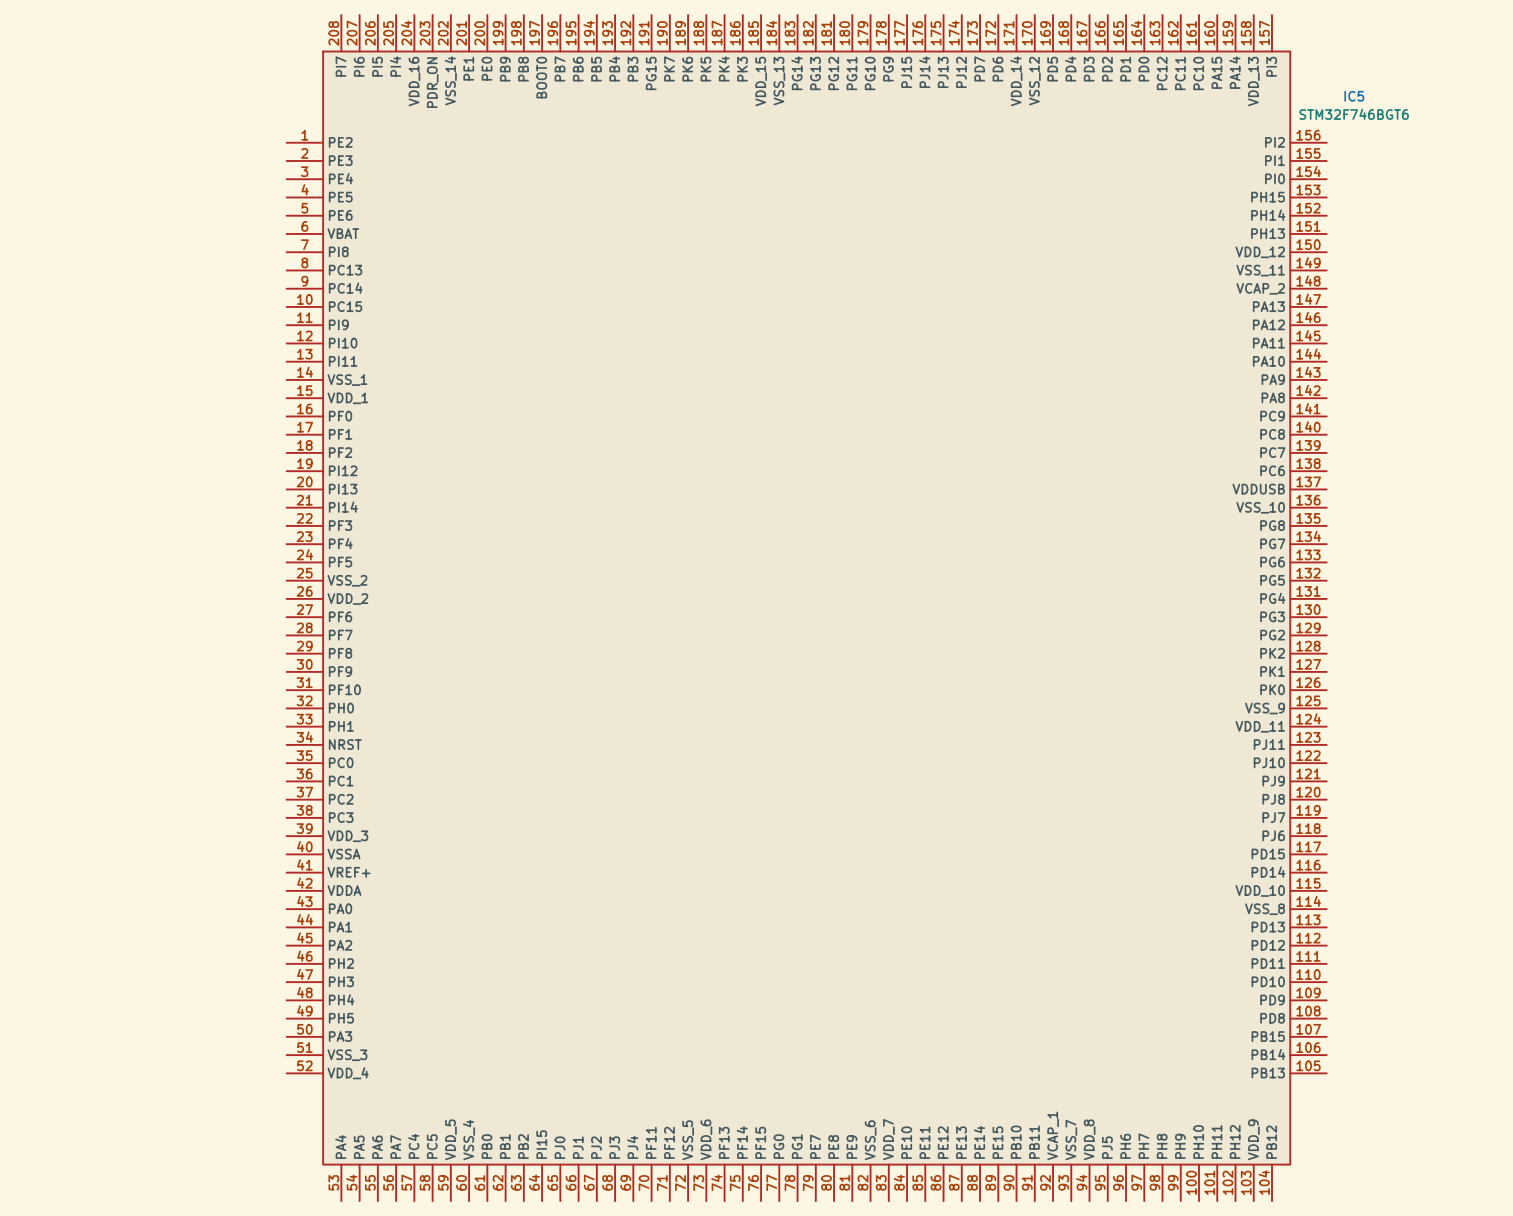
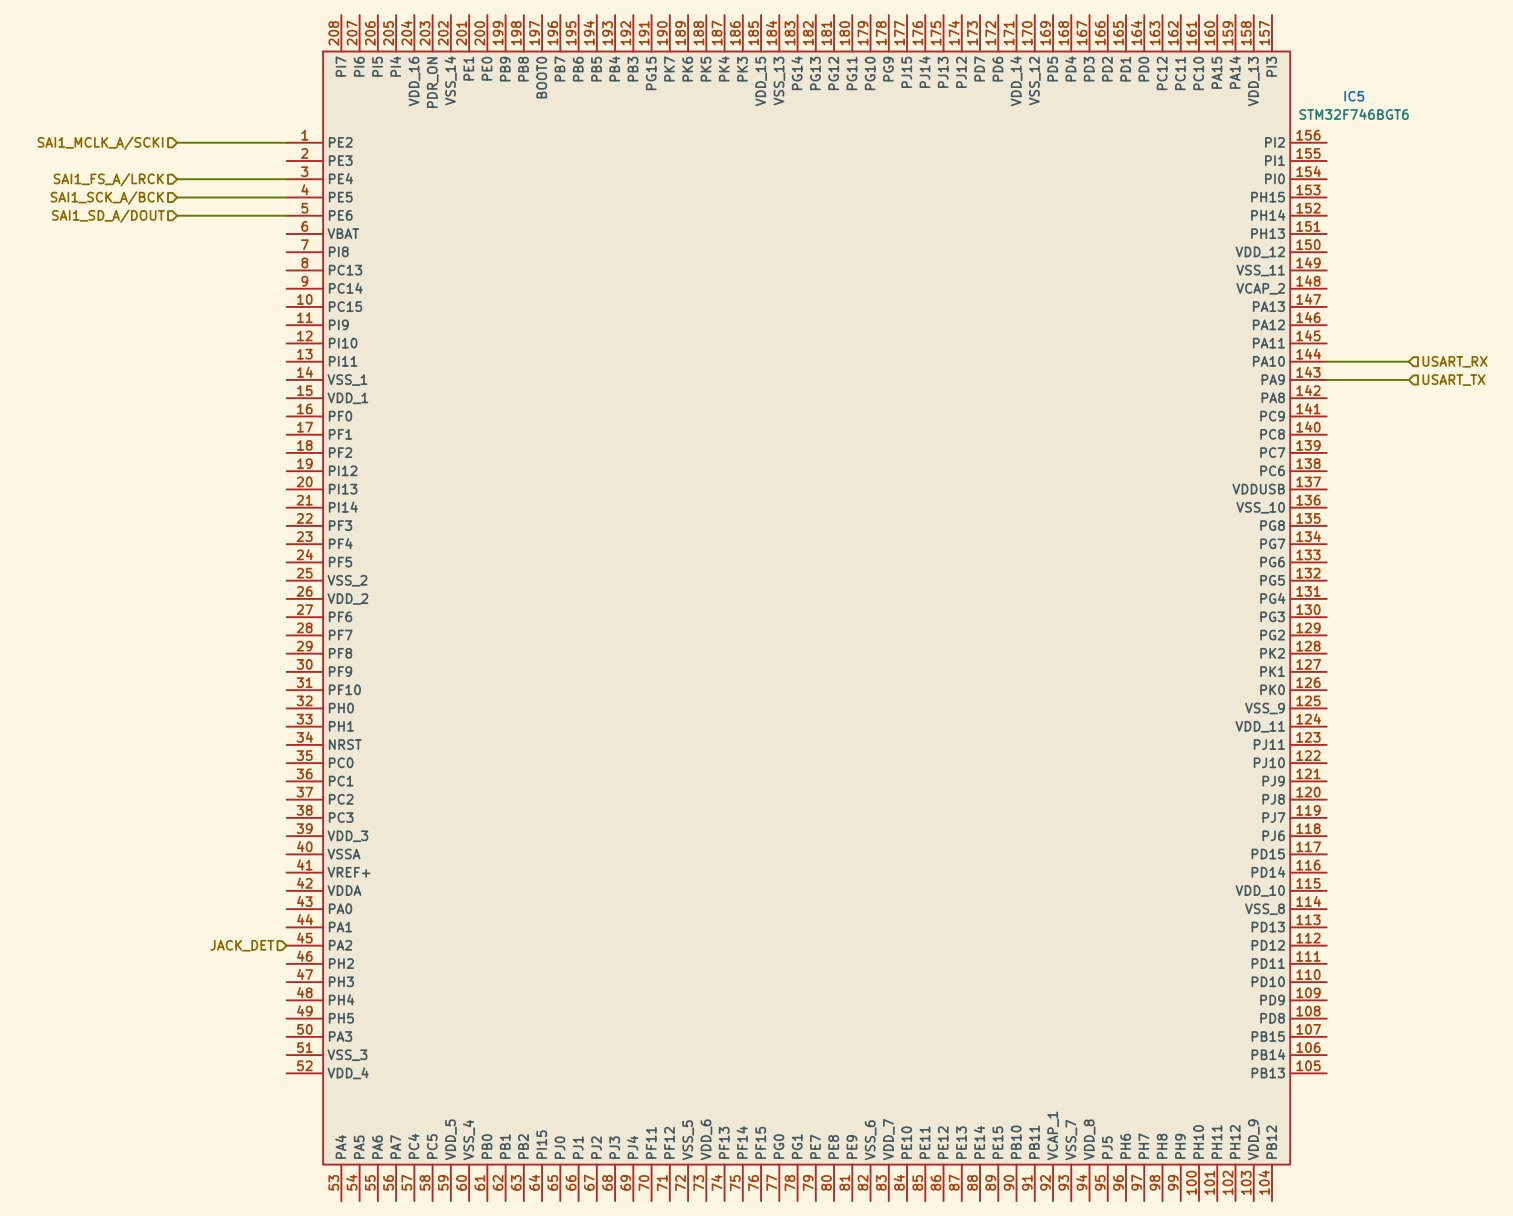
wire: none -> (177, 142) (286, 142)
hierarchical label: none -> SAI1_MCLK_A/SCKI (100, 143)
hierarchical label: none -> SAI1_FS_A/LRCK (108, 179)
wire: none -> (177, 179) (286, 179)
wire: none -> (177, 197) (286, 197)
hierarchical label: none -> SAI1_SCK_A/BCK (107, 198)
wire: none -> (177, 215) (286, 215)
hierarchical label: none -> SAI1_SD_A/DOUT (108, 216)
wire: none -> (1326, 361) (1408, 361)
hierarchical label: none -> USART_RX (1455, 361)
wire: none -> (1326, 379) (1408, 379)
hierarchical label: none -> USART_TX (1453, 380)
hierarchical label: none -> JACK_DET (242, 945)

